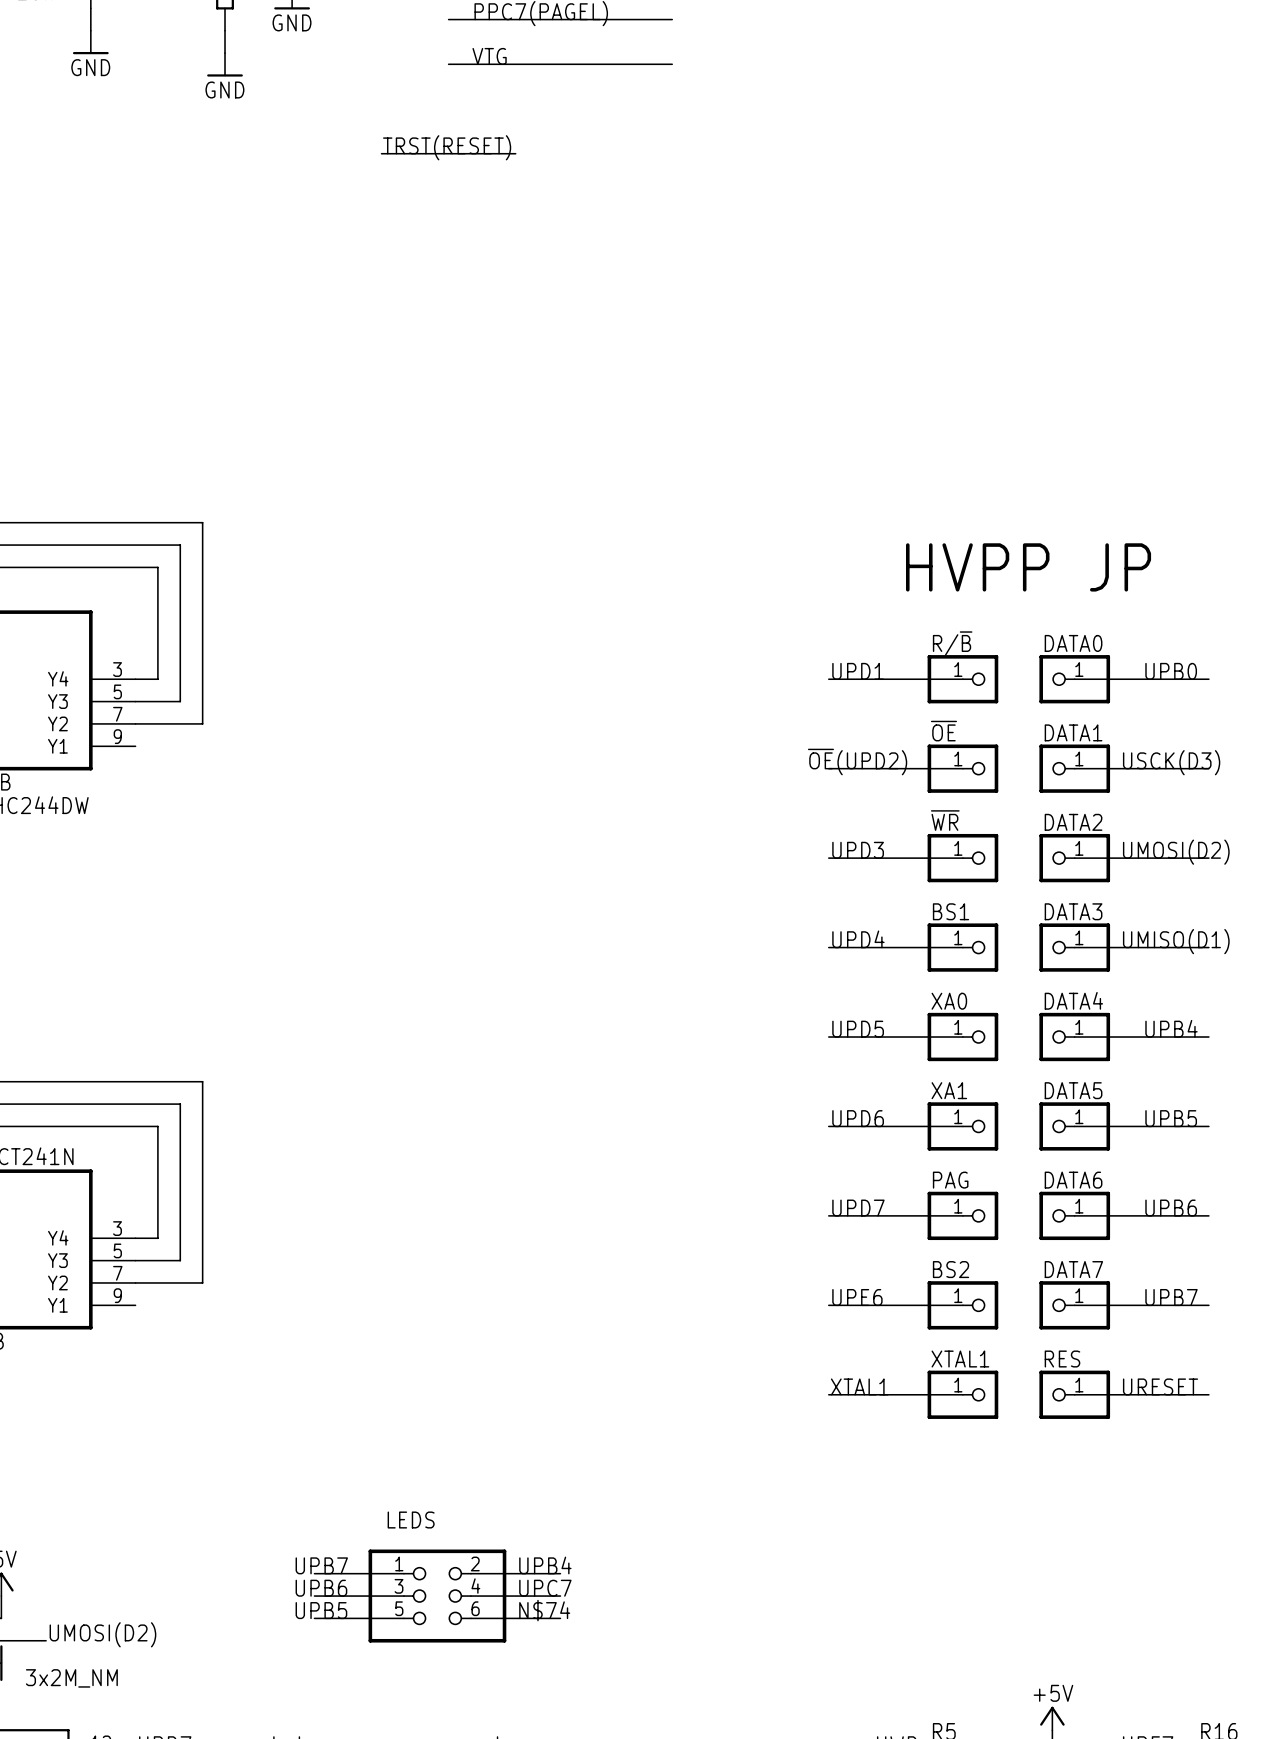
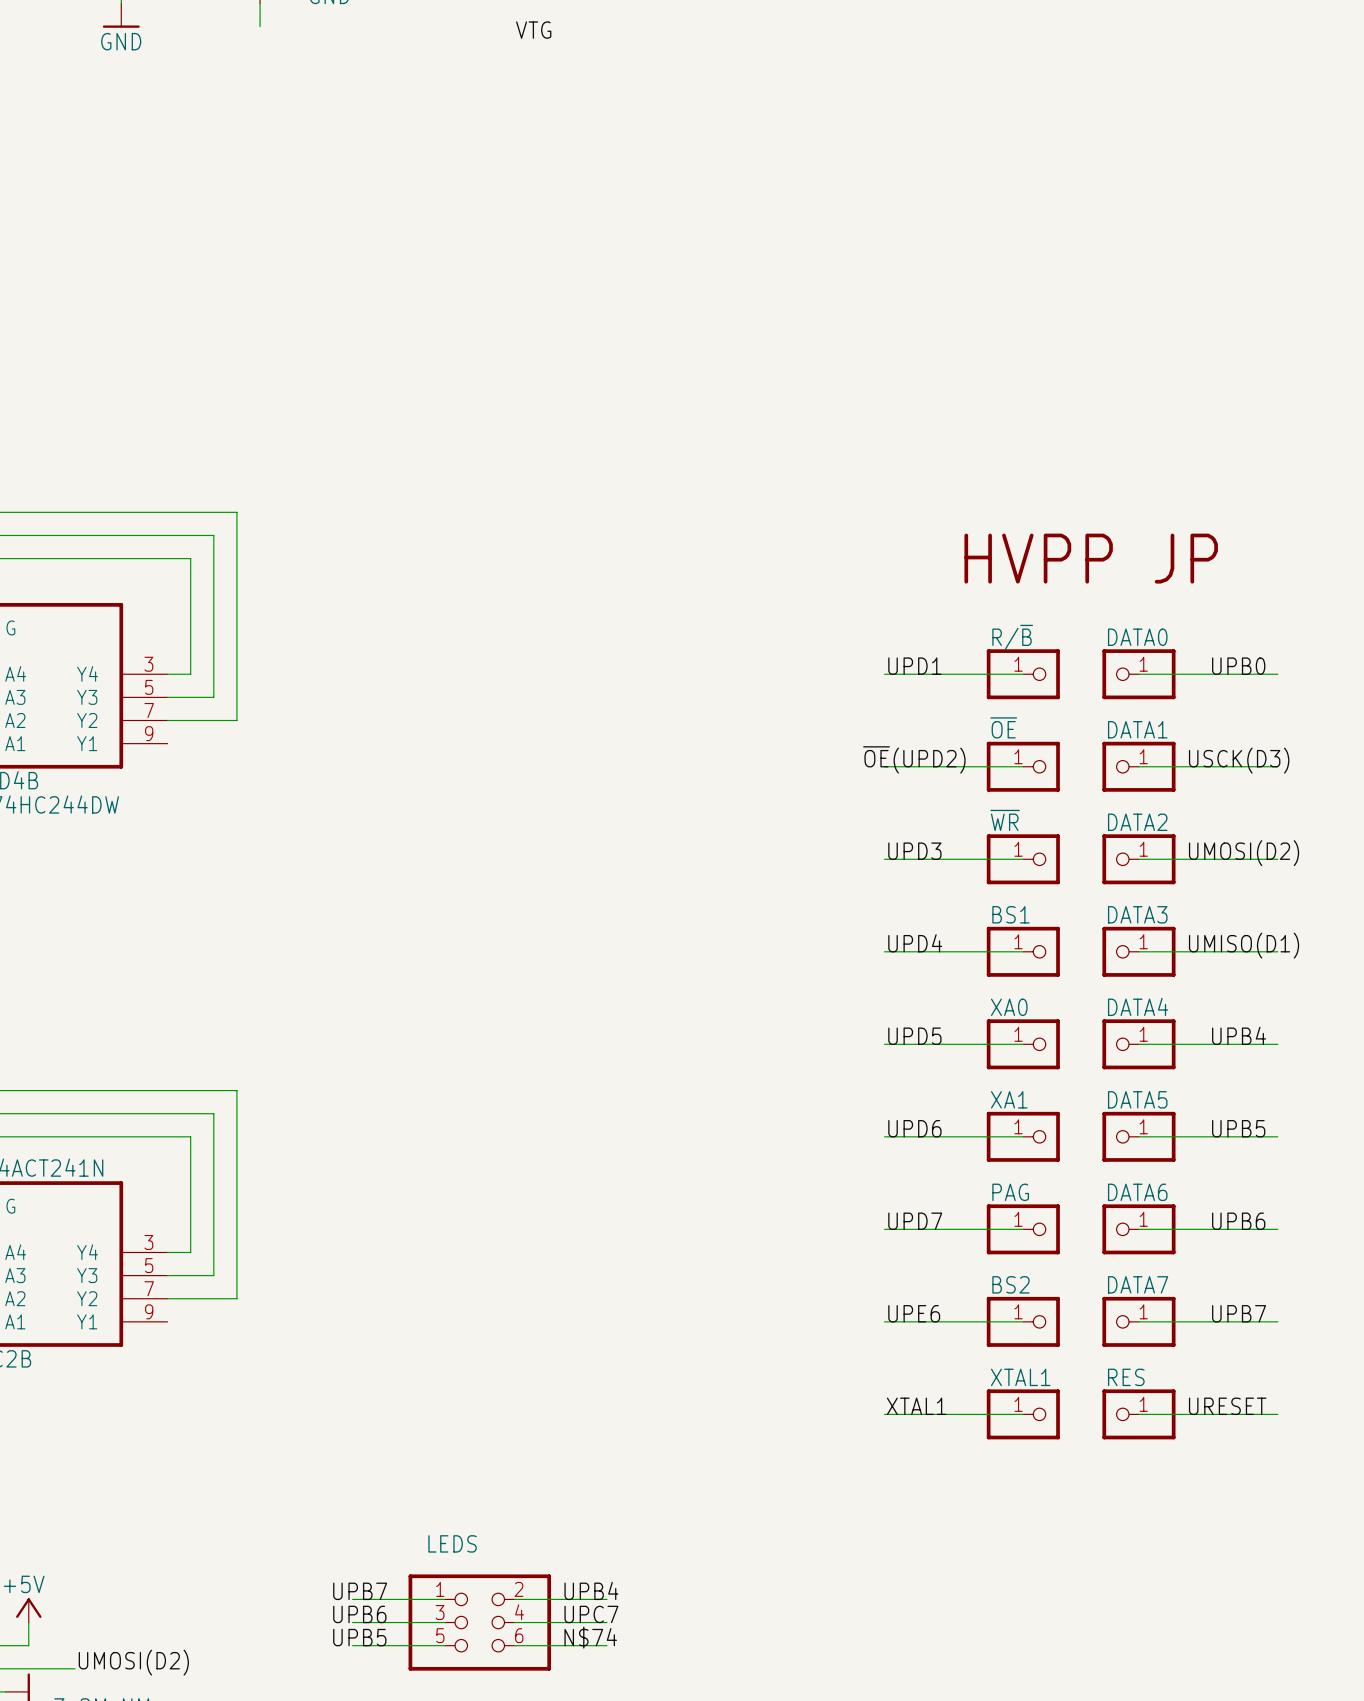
power symbol: GND (225, 64) -> none
wire: (448, 64) (672, 64) -> none
label: TRST(RESET) (447, 147) -> none
wire: (381, 153) (515, 153) -> none

